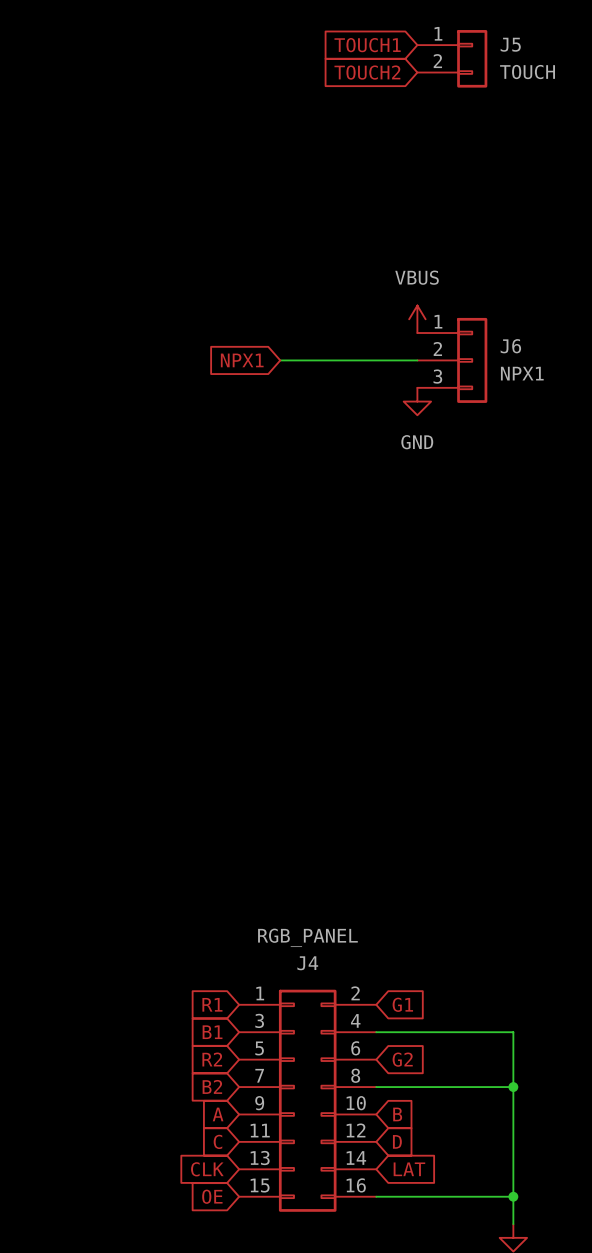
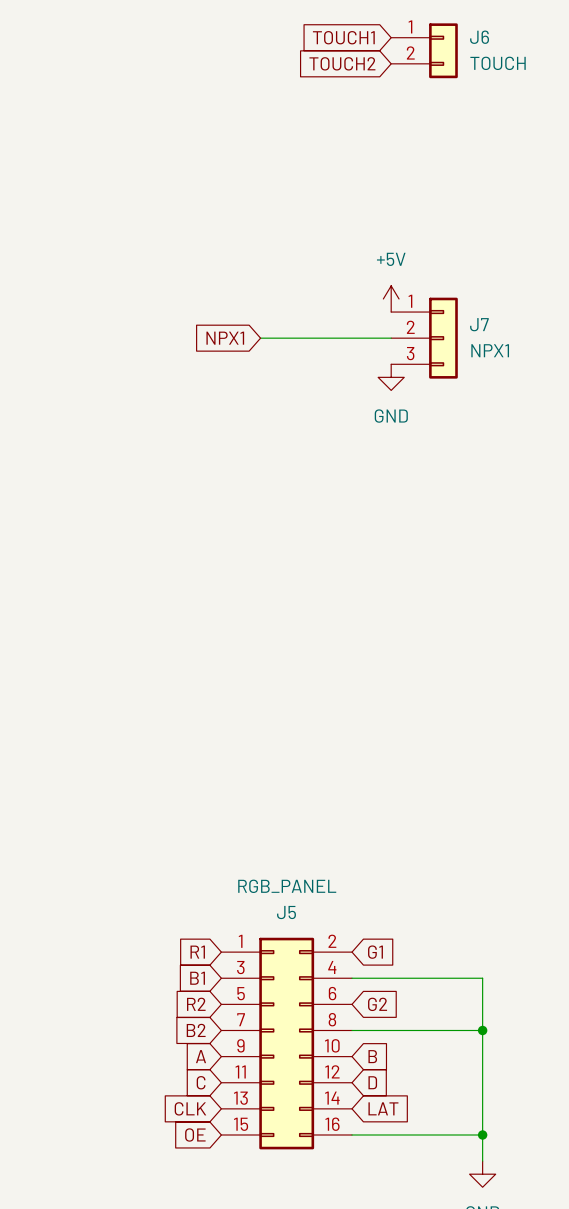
J5 name: J5 (510, 44) -> J6 (479, 37)
power symbol: VBUS (417, 319) -> +5V (391, 298)
J6 name: J6 (510, 346) -> J7 (479, 324)
J4 name: J4 (307, 963) -> J5 (286, 912)

